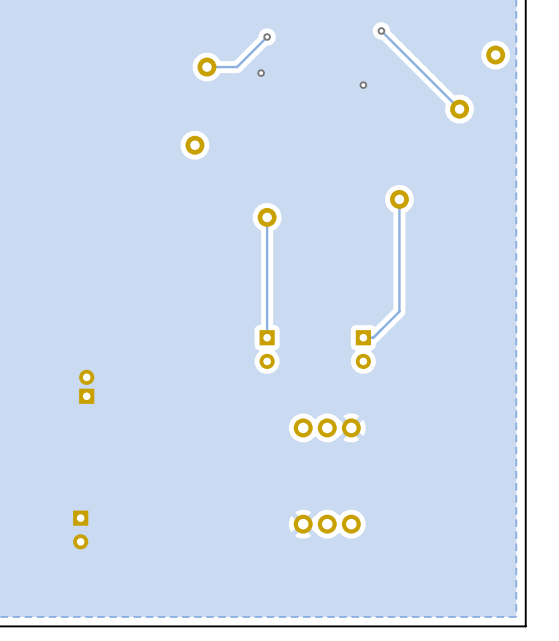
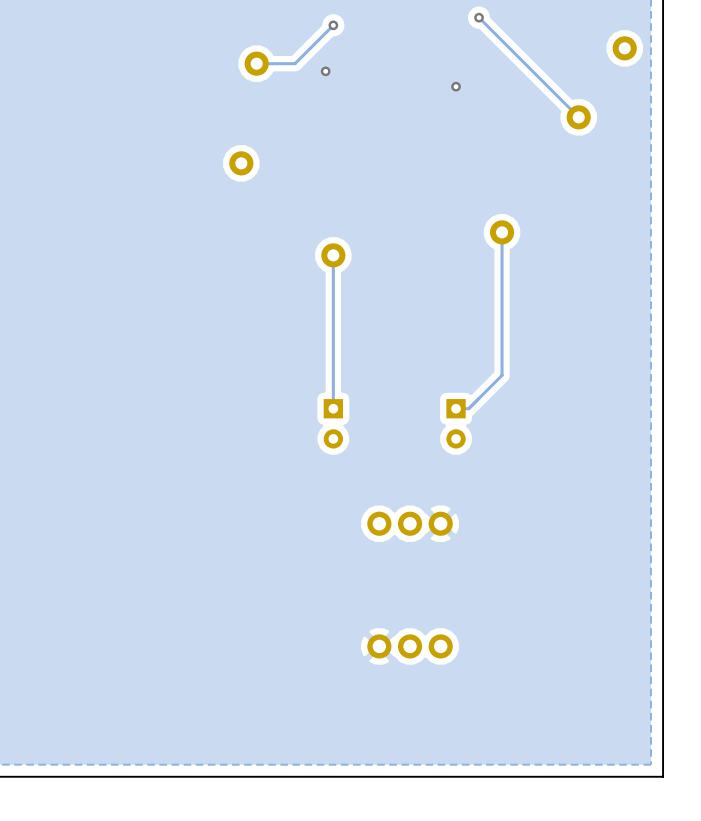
part: (86, 386) -> none
part: (80, 529) -> none

